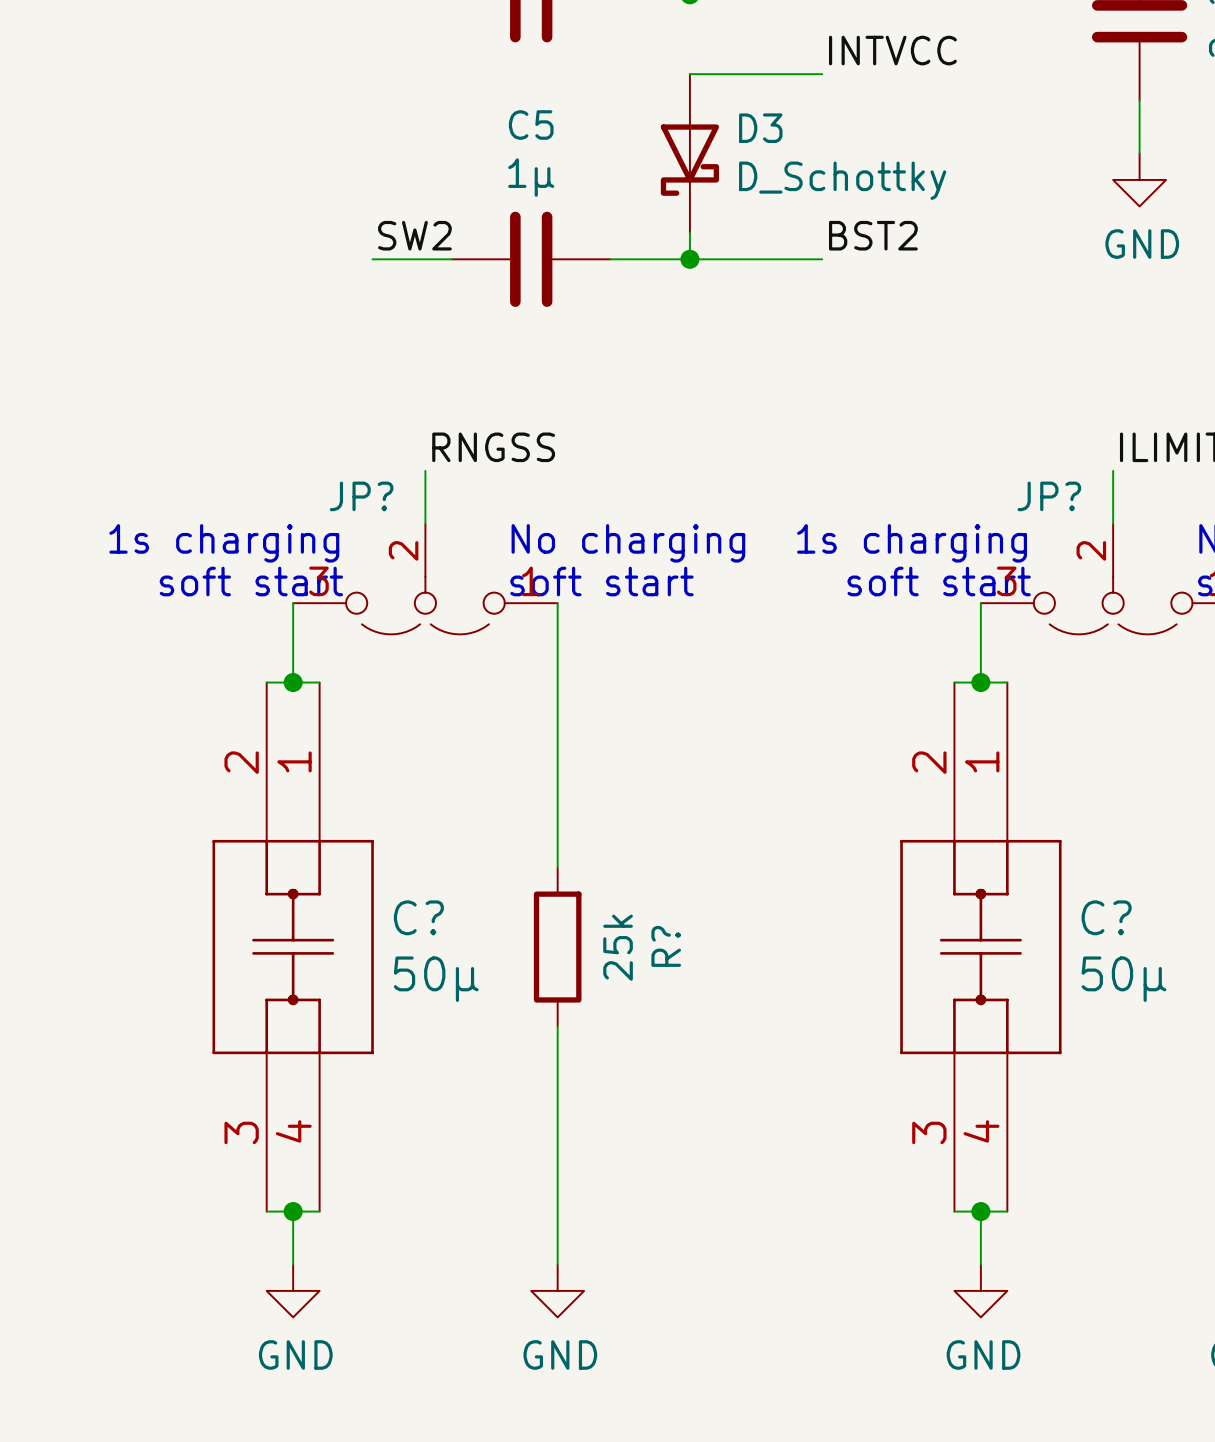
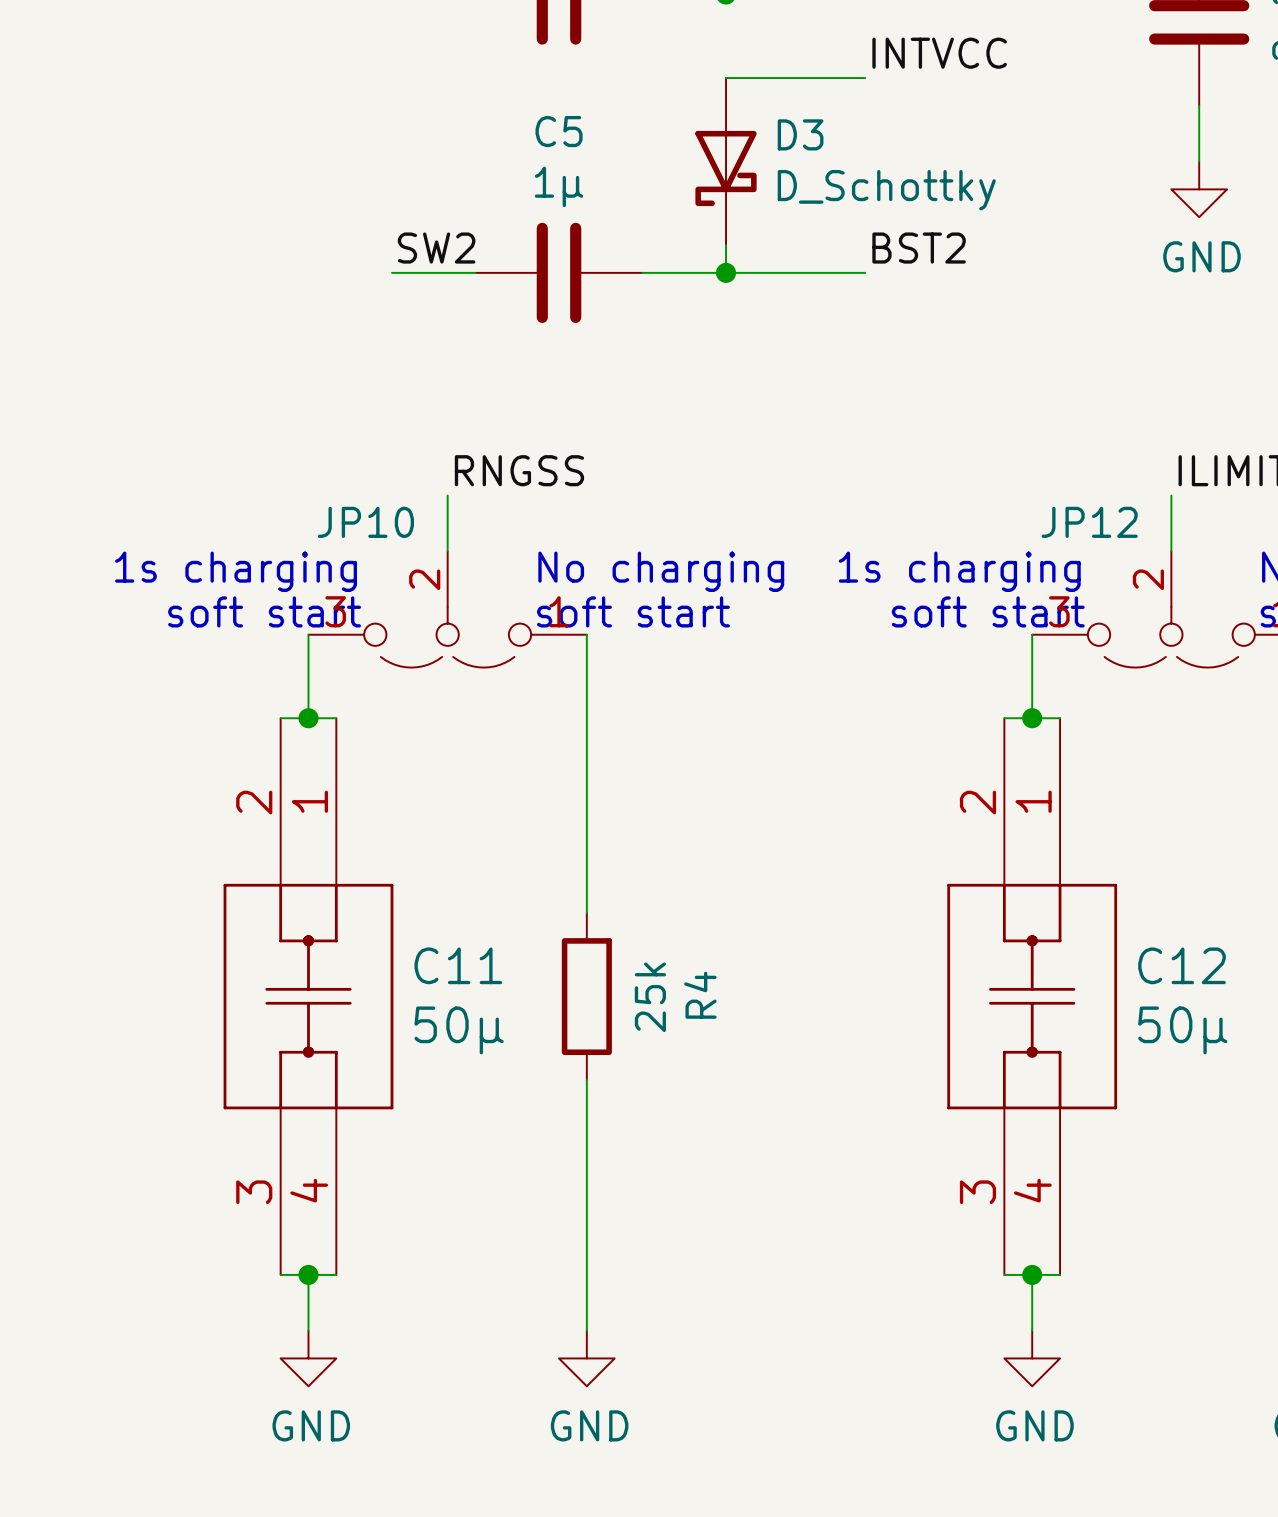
JP? name: JP? (361, 496) -> JP10 (365, 522)
JP? name: JP? (1049, 496) -> JP12 (1089, 522)
C? name: C? (418, 917) -> C11 (458, 965)
C? name: C? (1106, 917) -> C12 (1182, 965)
R? name: R? (666, 946) -> R4 (700, 995)

